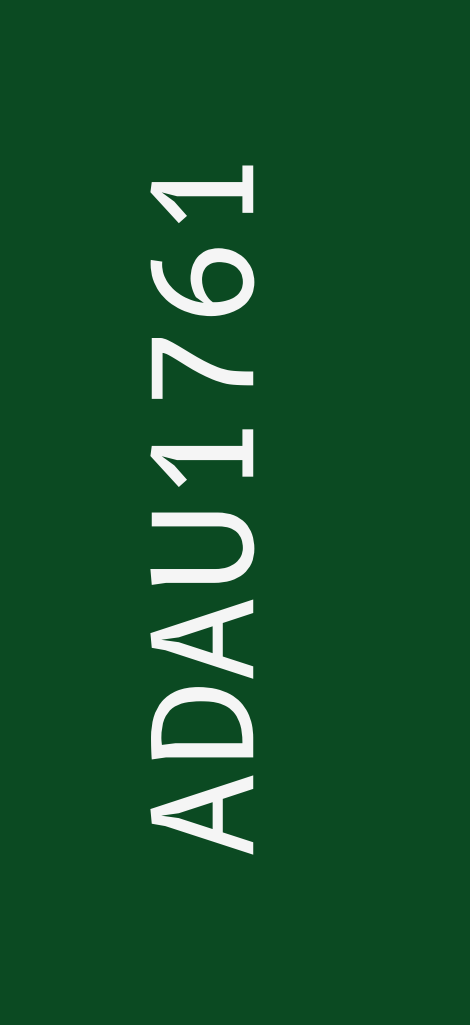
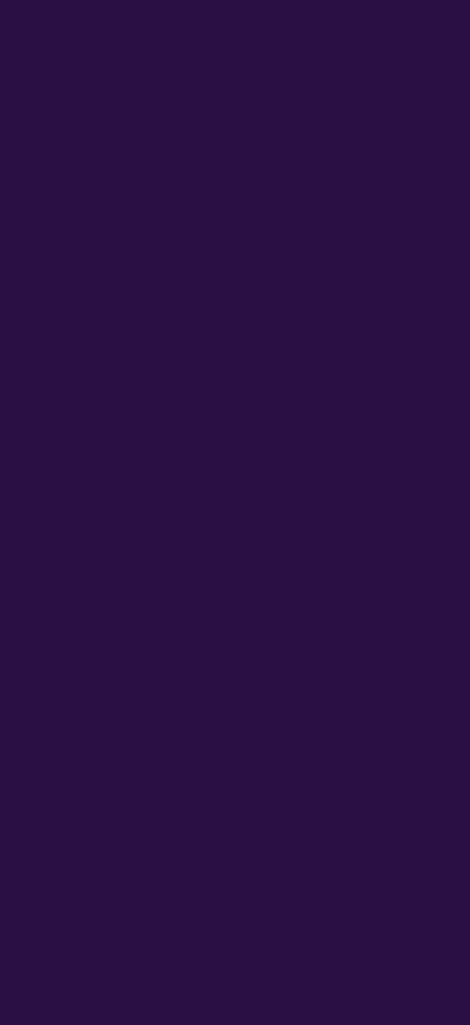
text: ADAU1761 (202, 510) -> none

